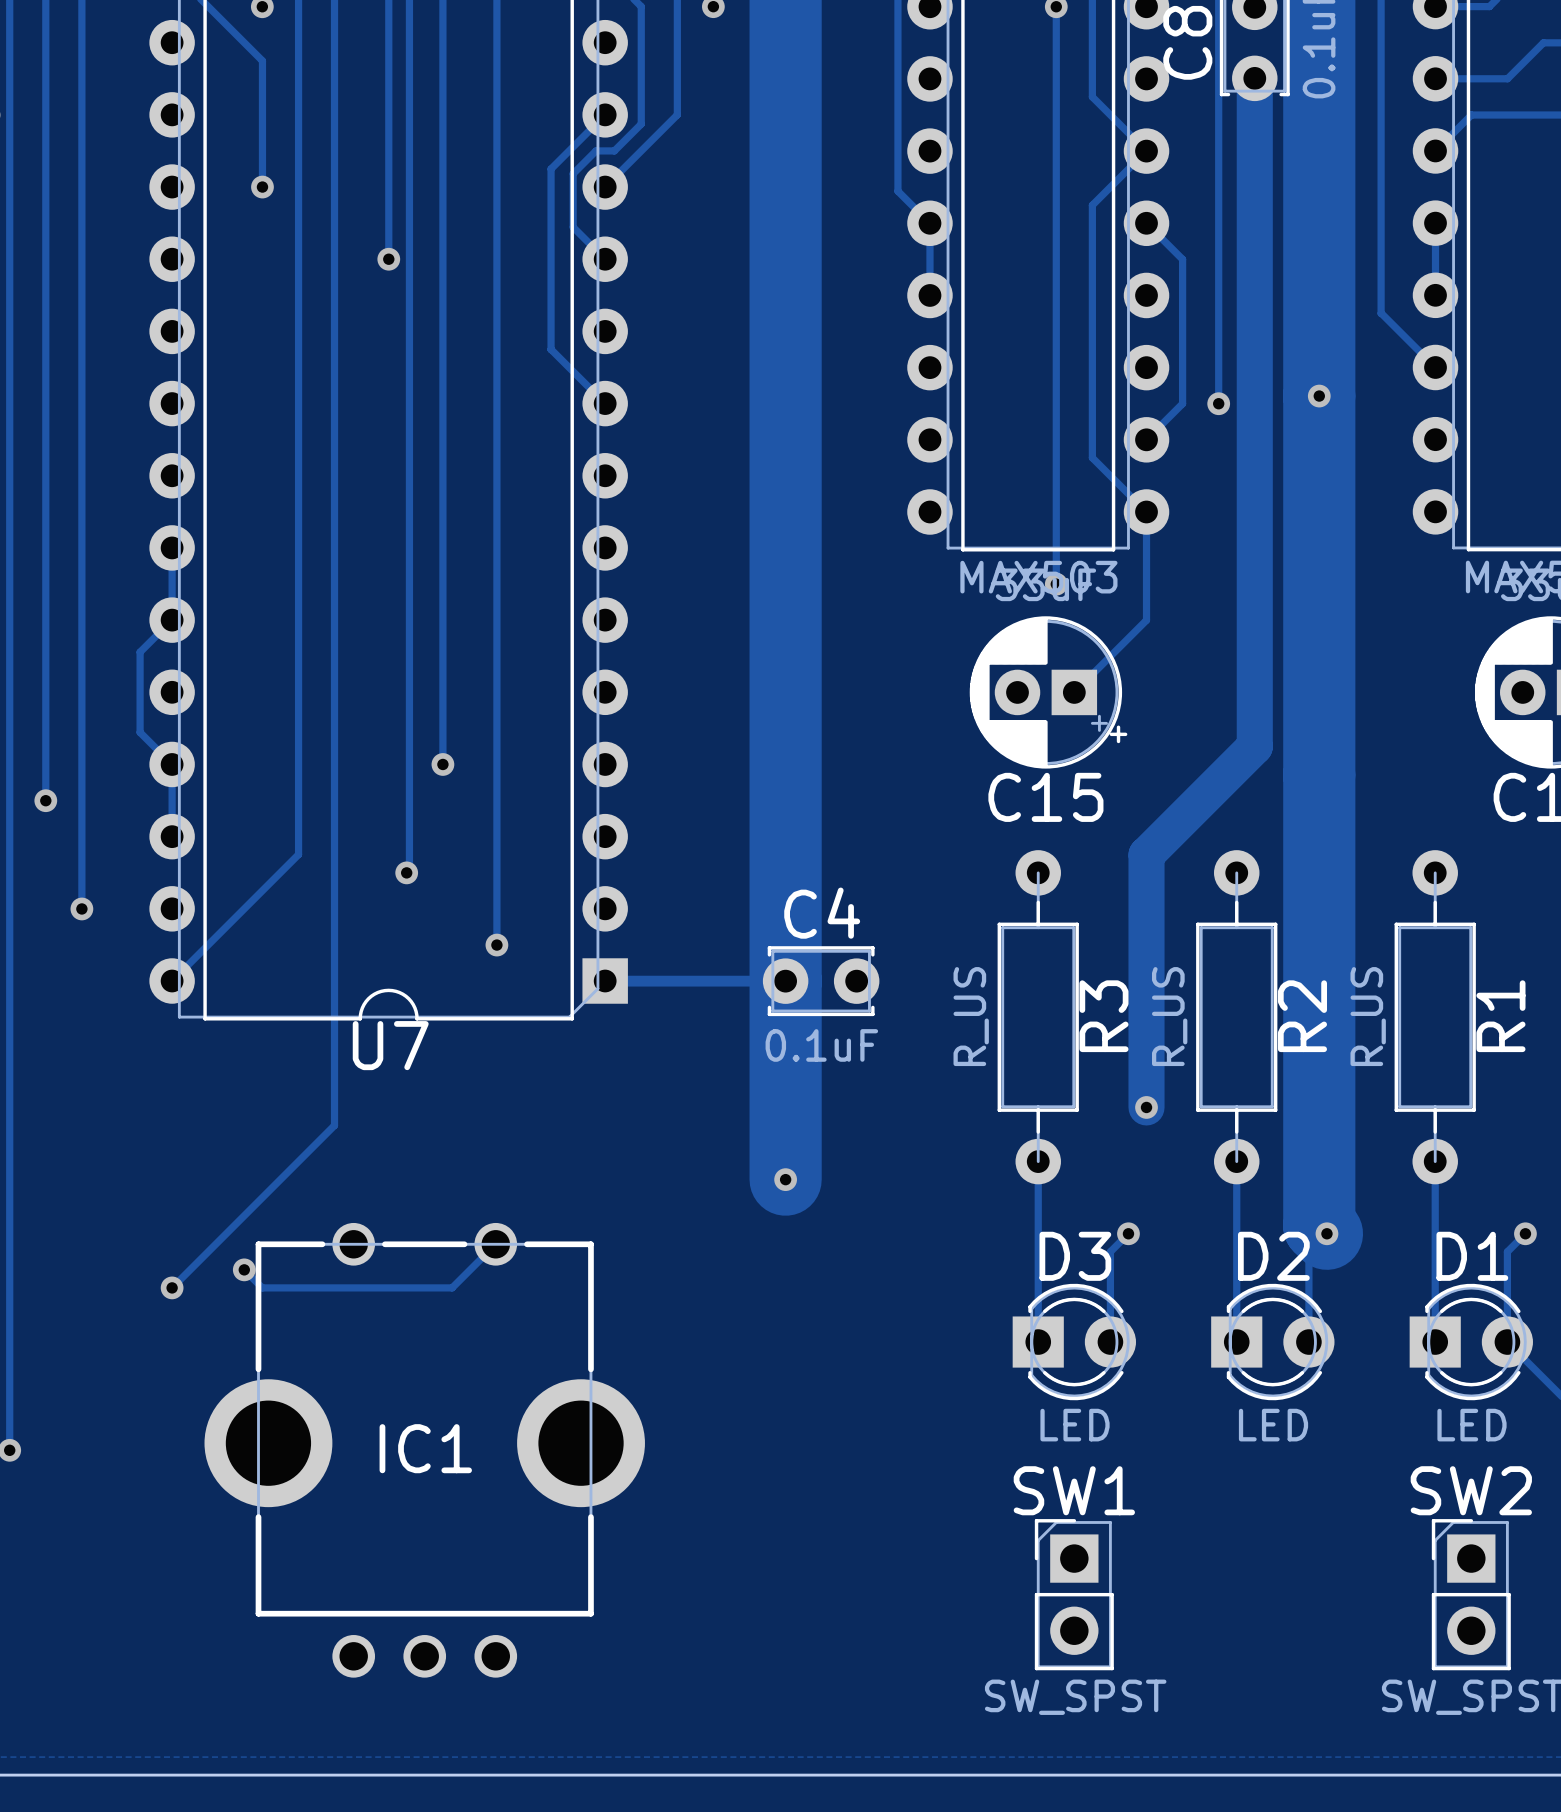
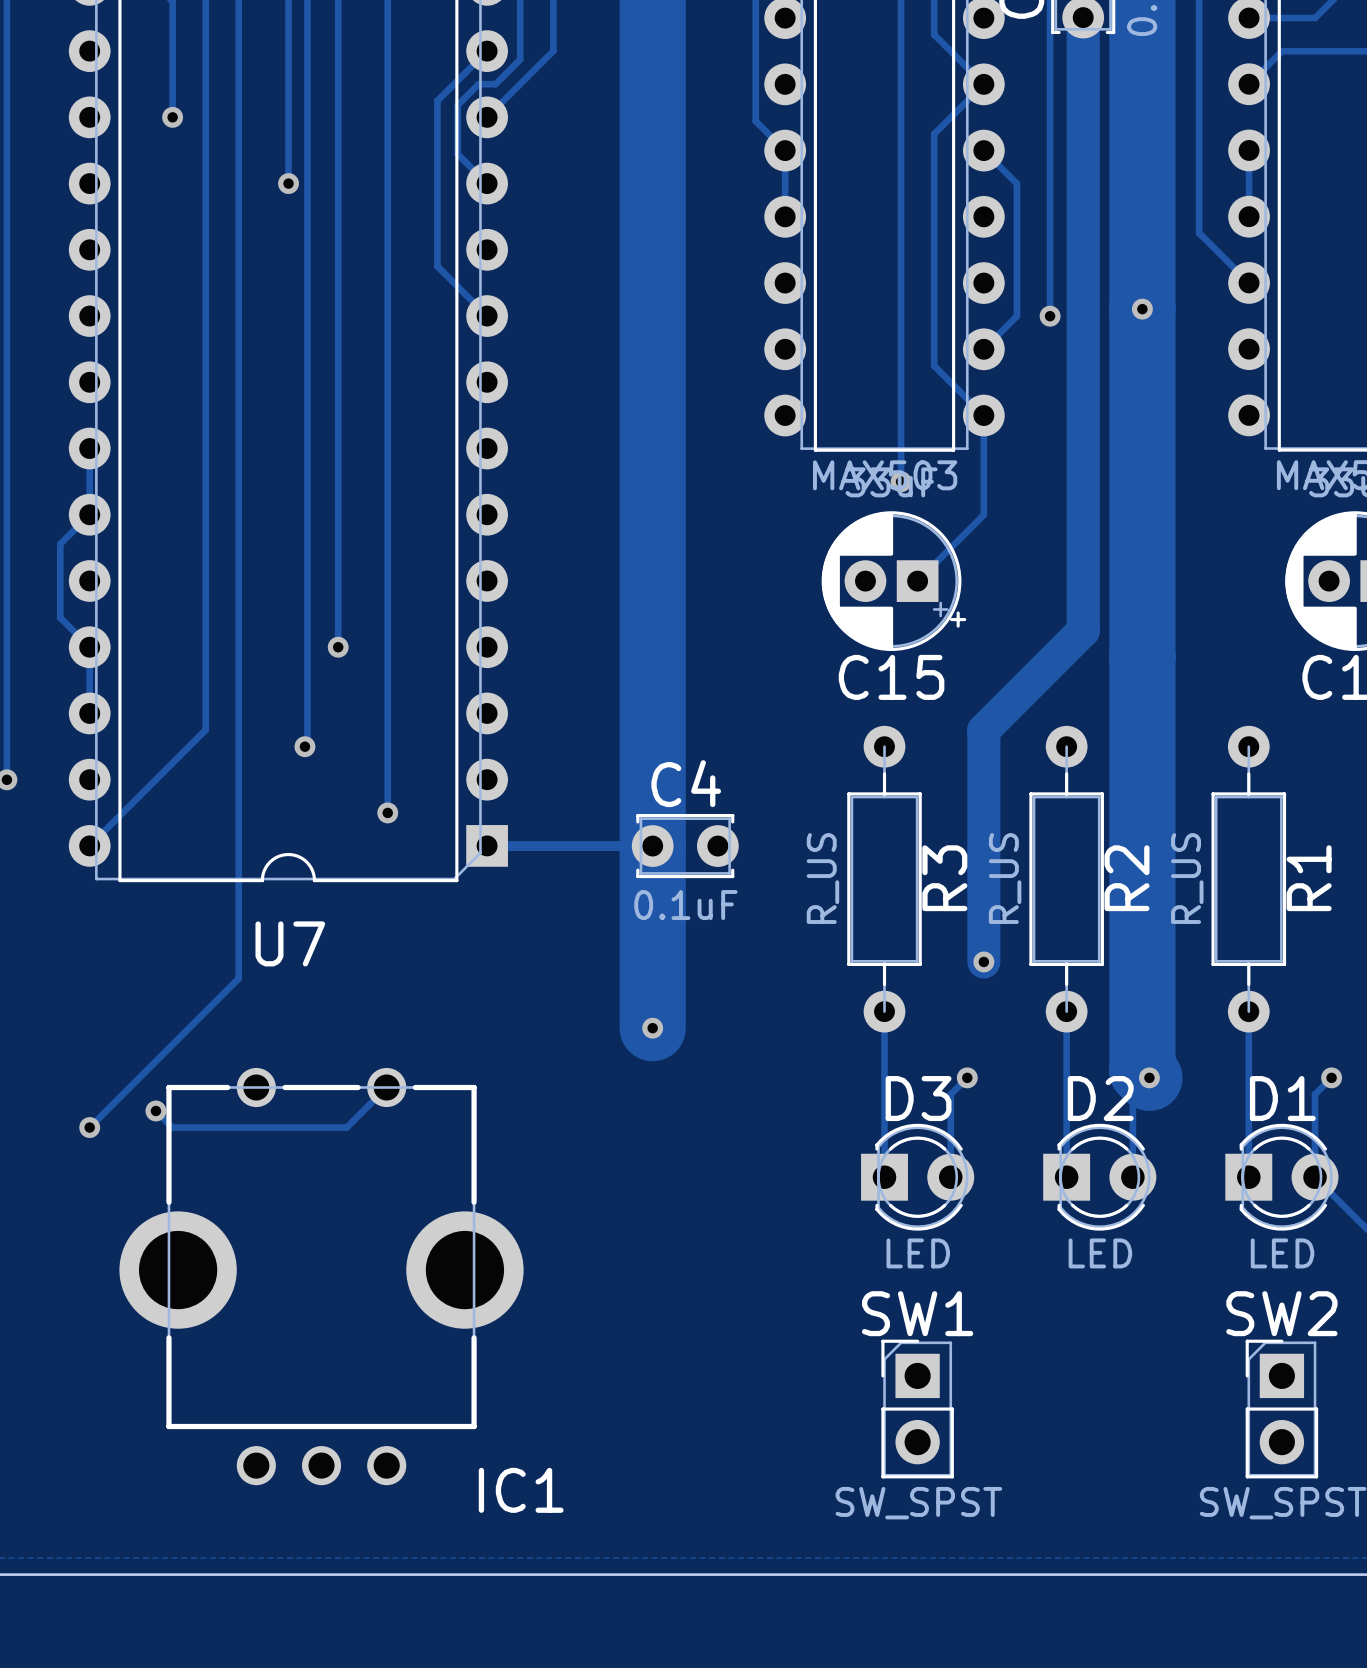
U7 name position: U7 (390, 1045) -> U7 (290, 943)
IC1 name position: IC1 (425, 1448) -> IC1 (521, 1490)

